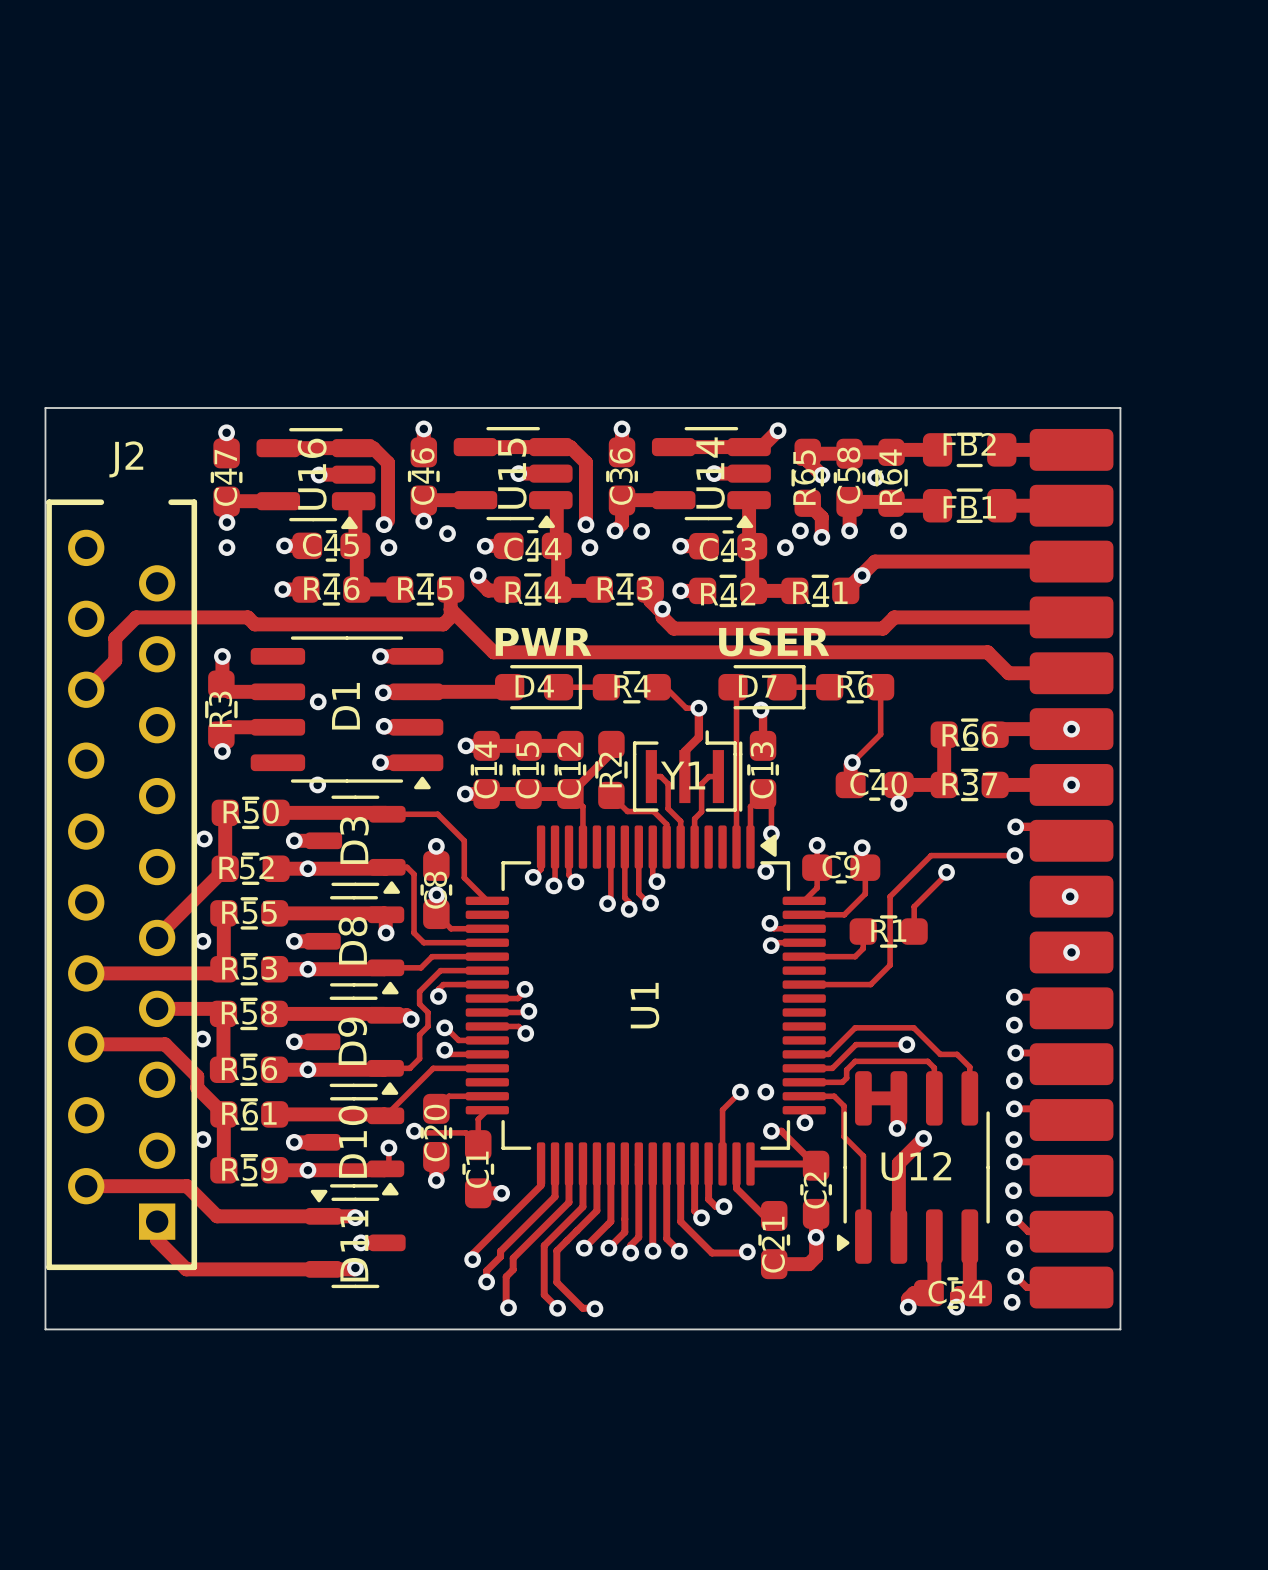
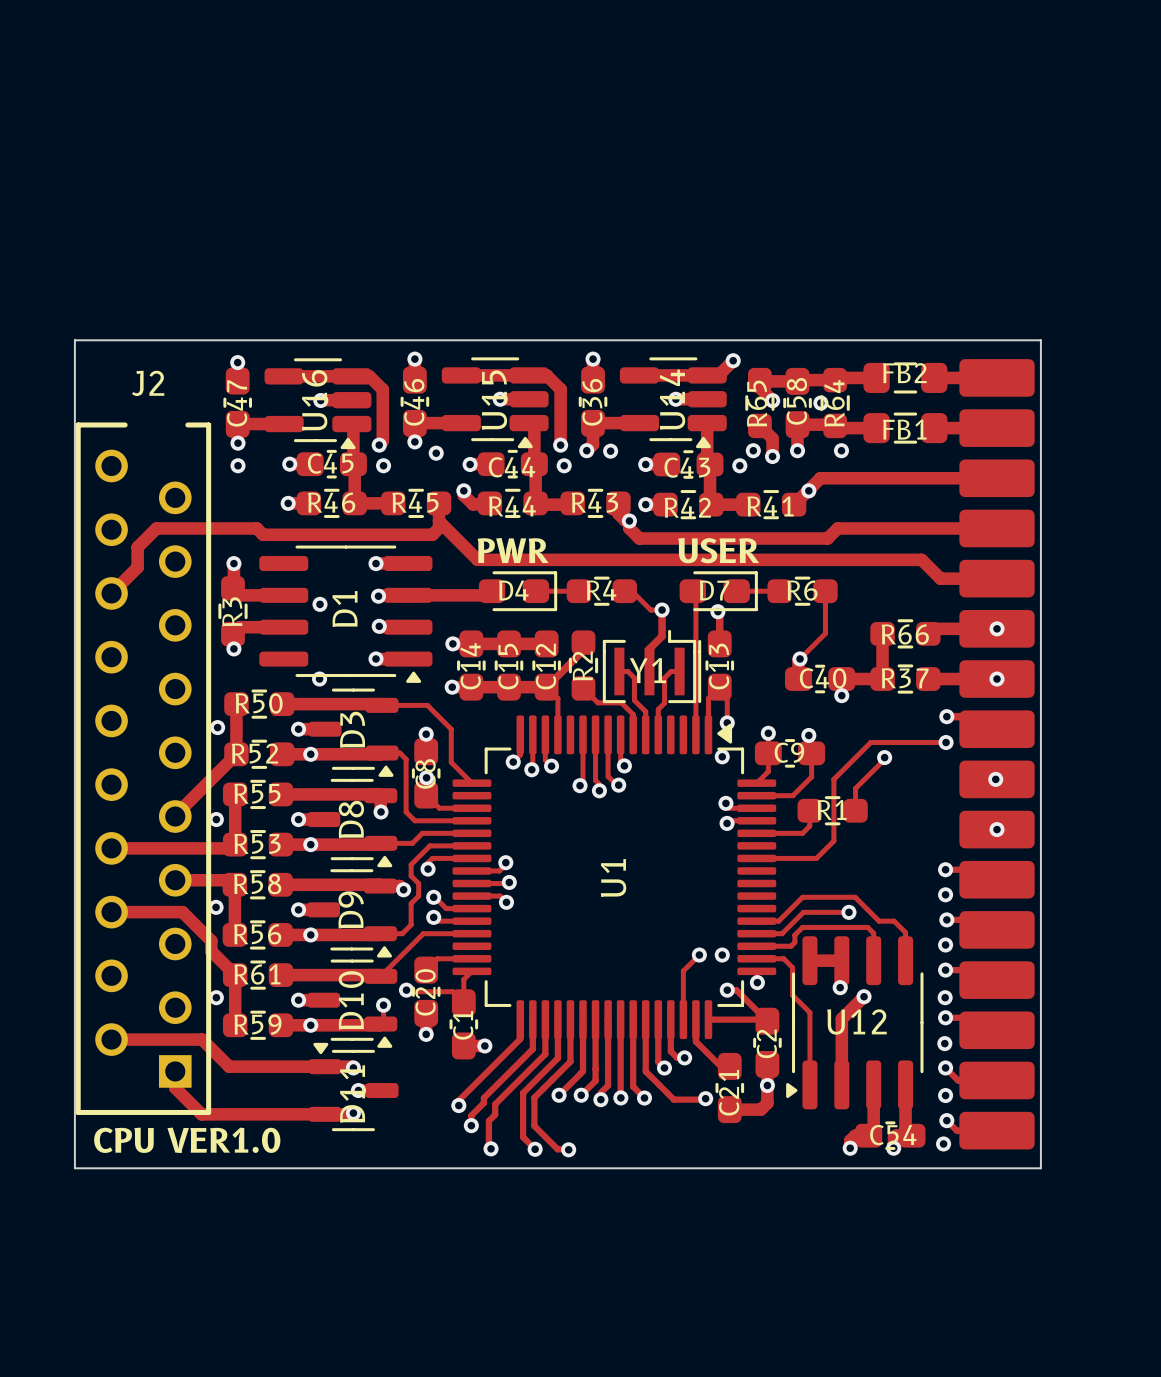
text: none -> CPU VER1.0 (187, 1140)

